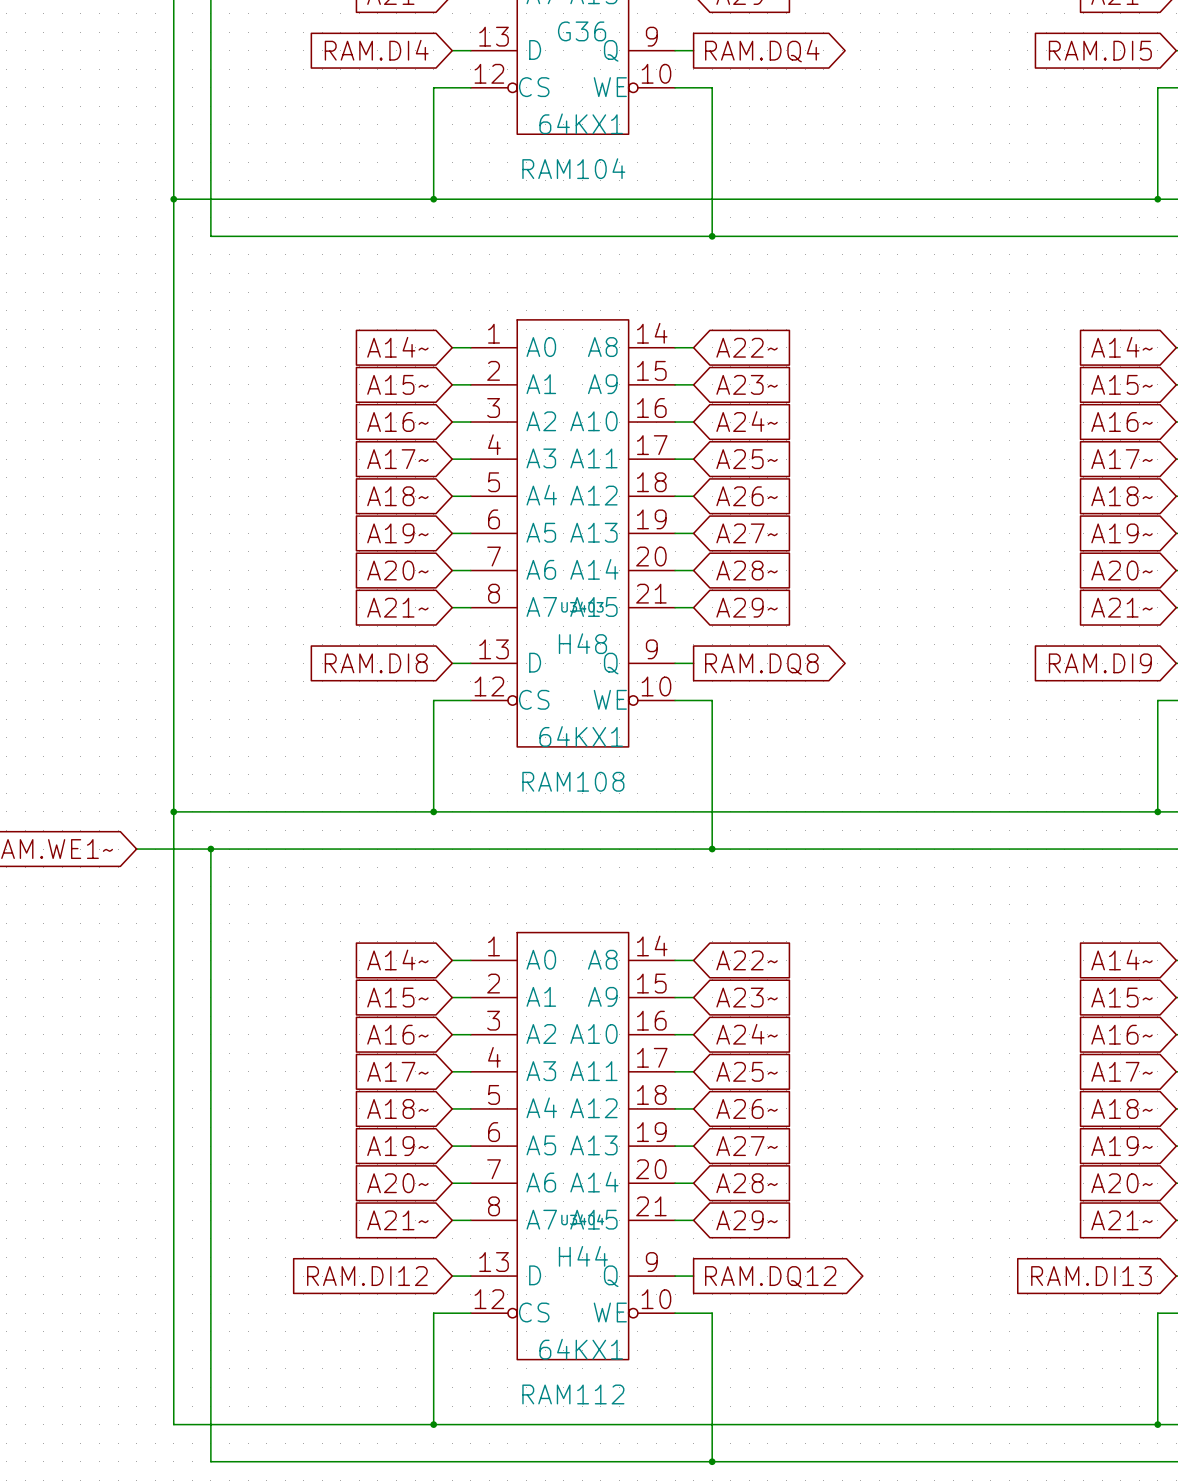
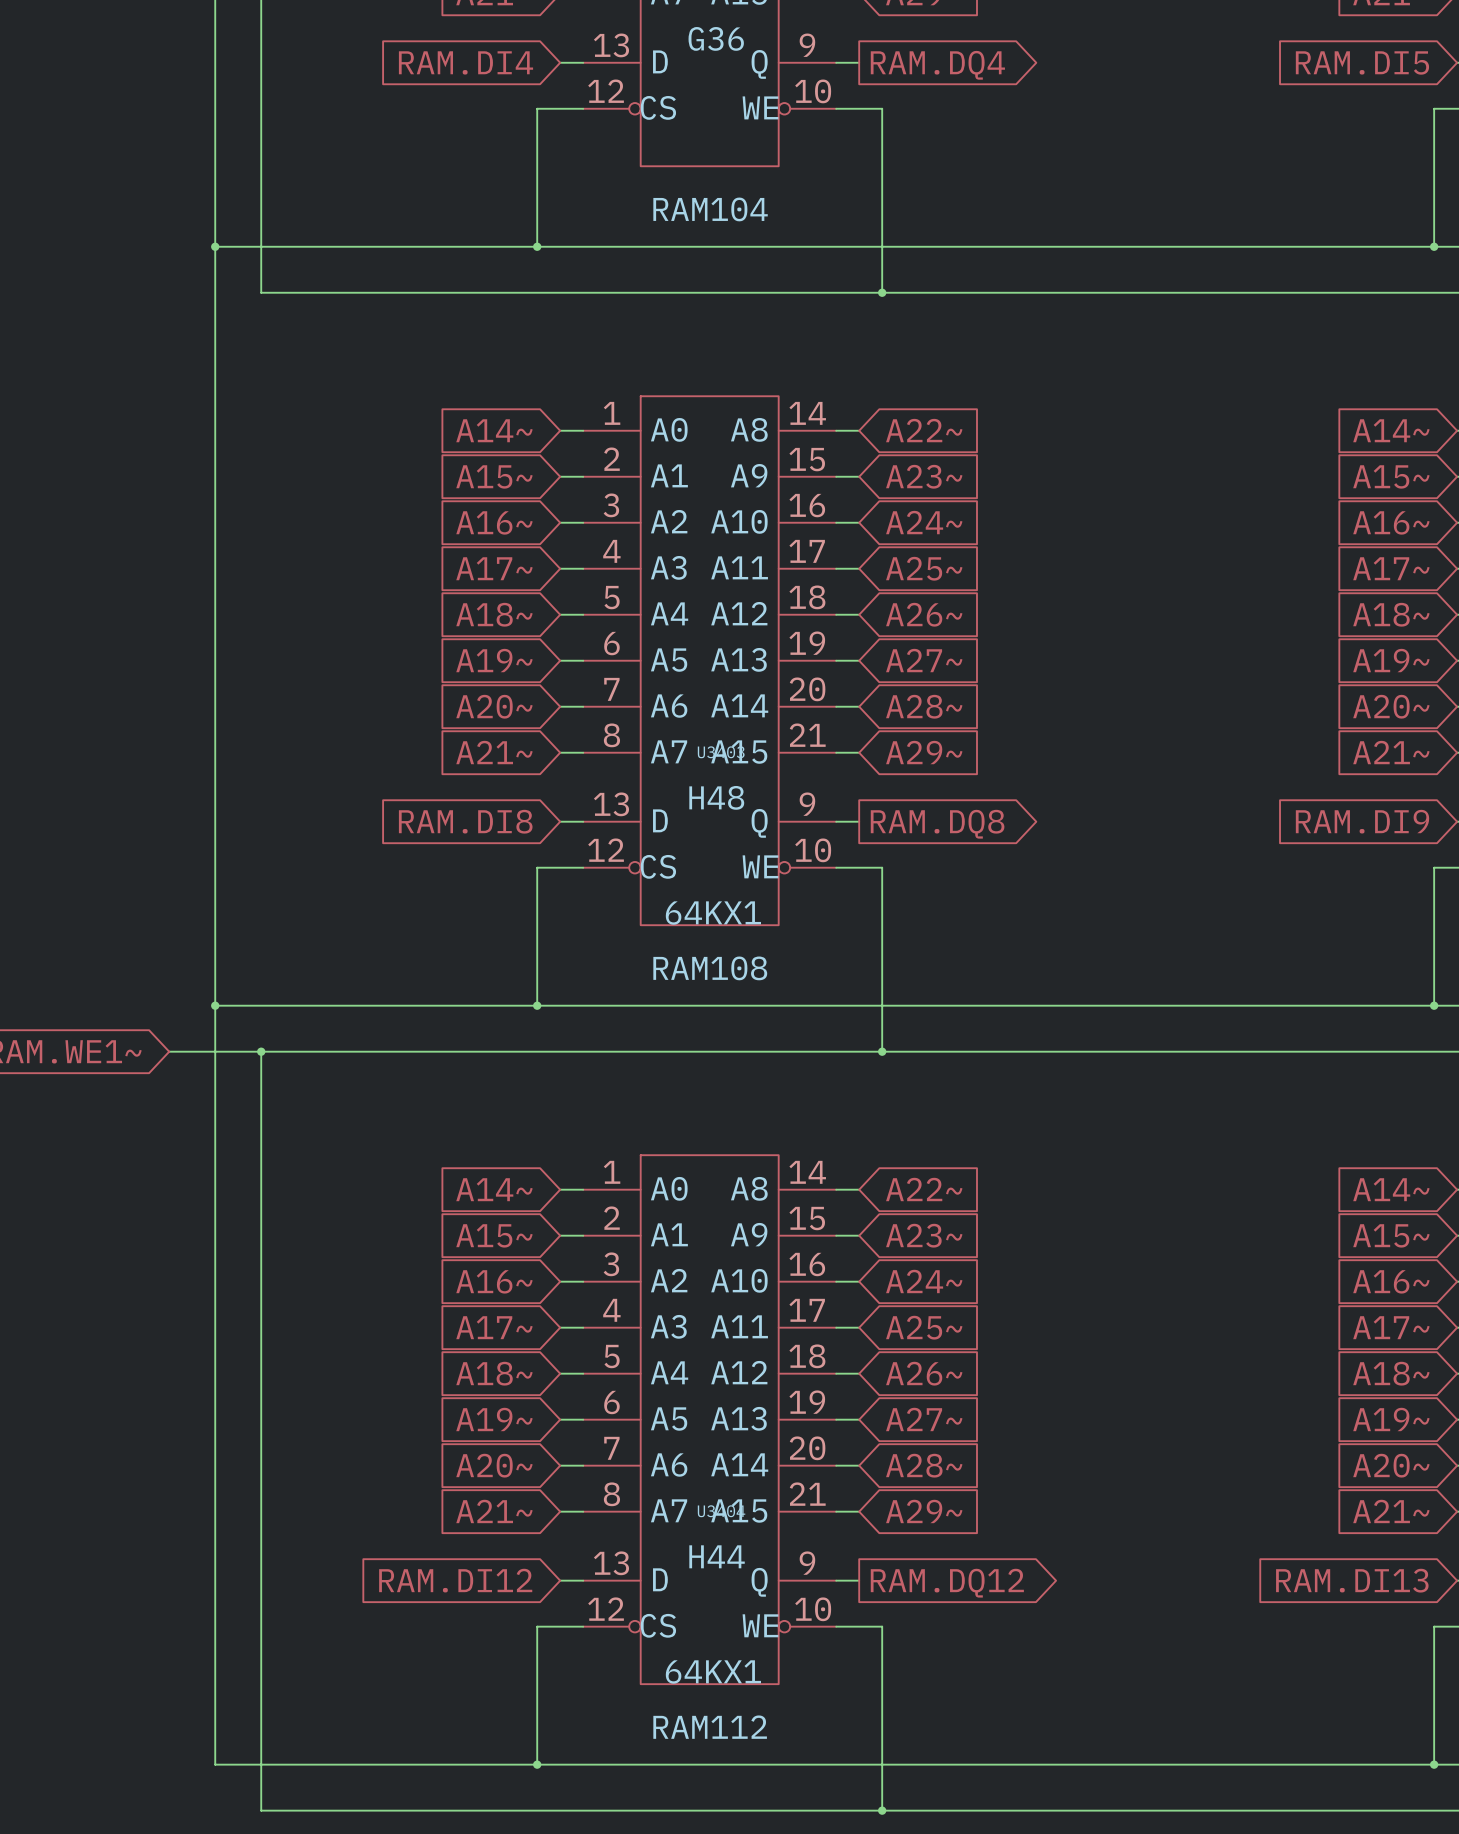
part value: 64KX1 (581, 123) -> none

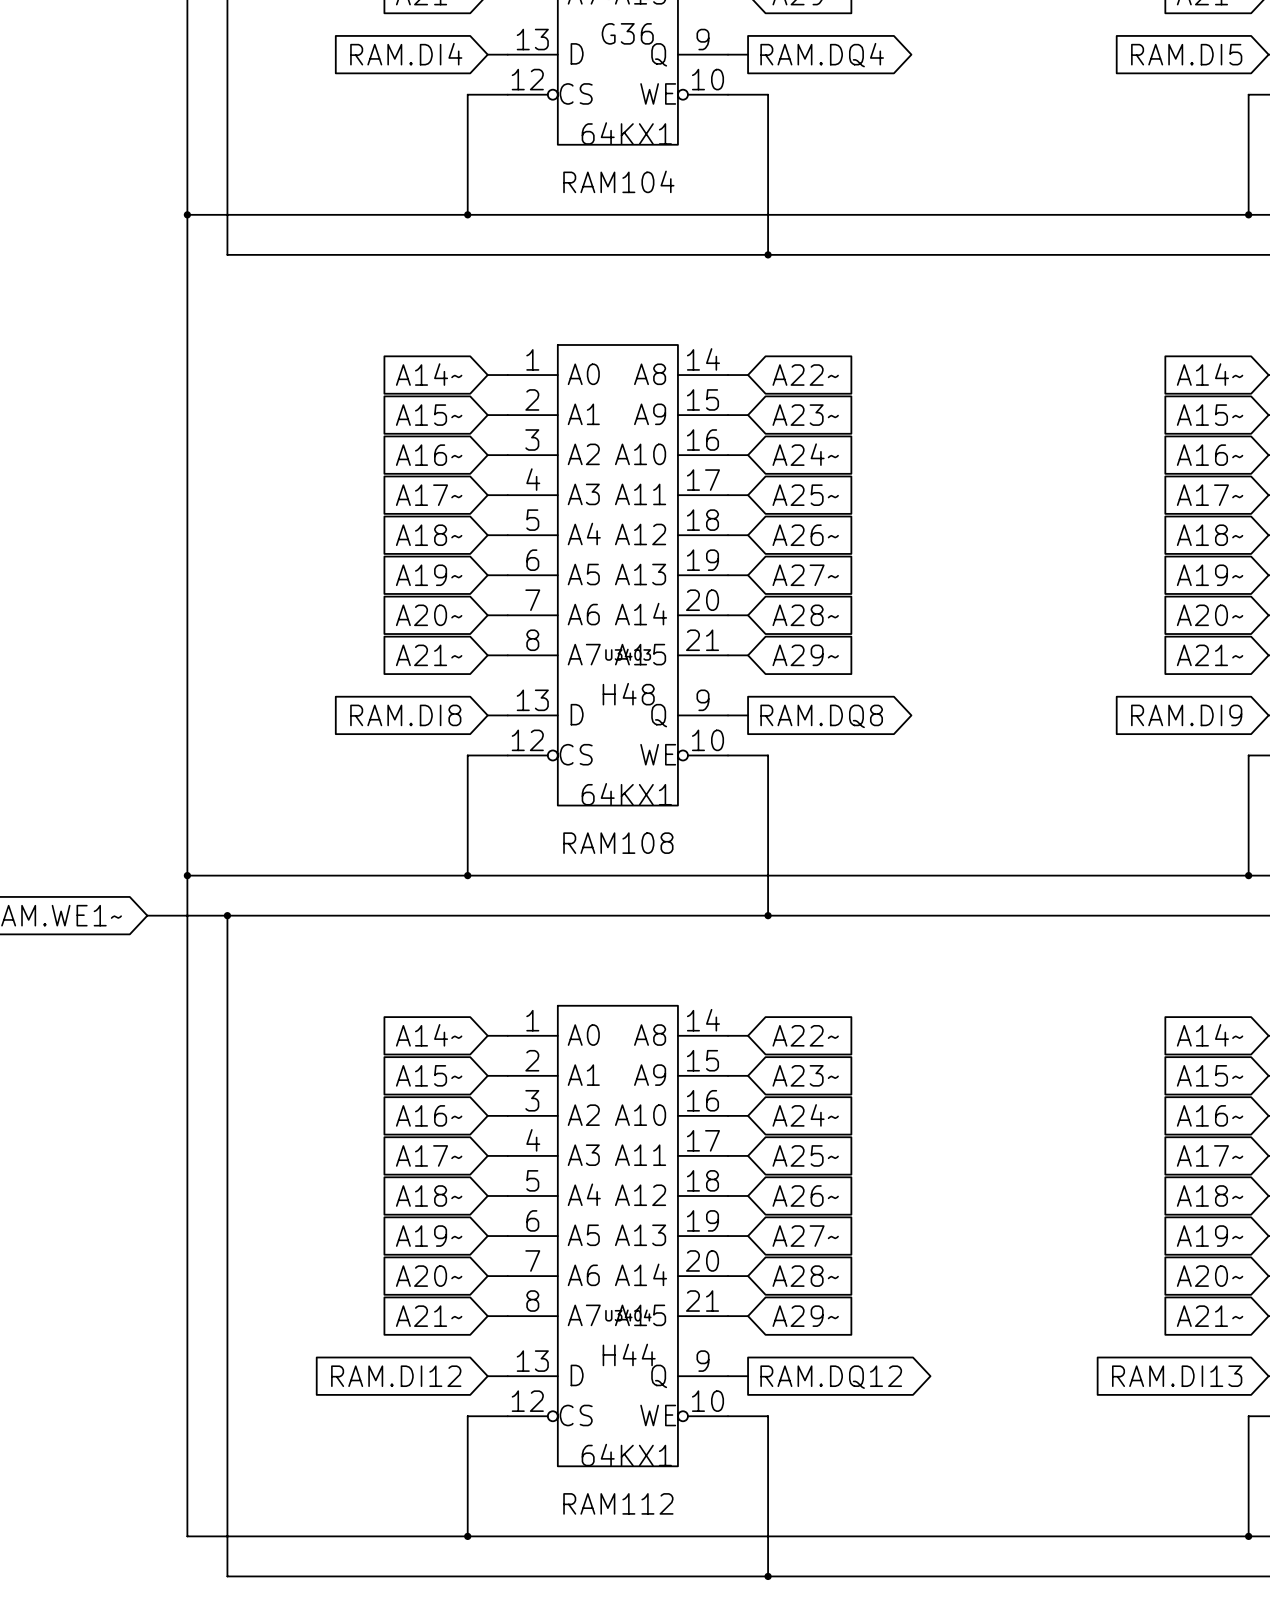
part value: none -> 64KX1 (626, 133)

